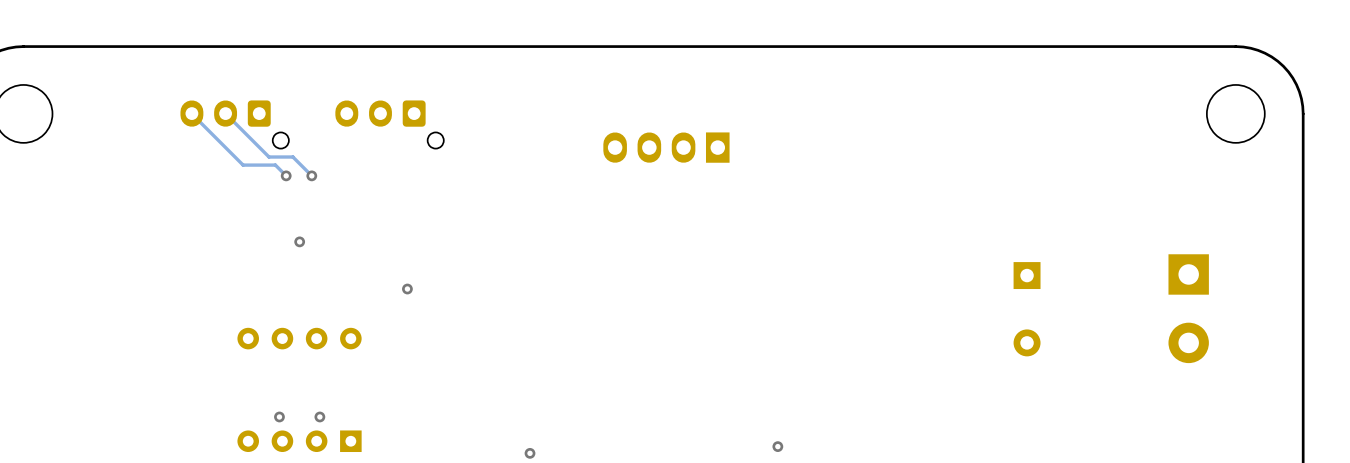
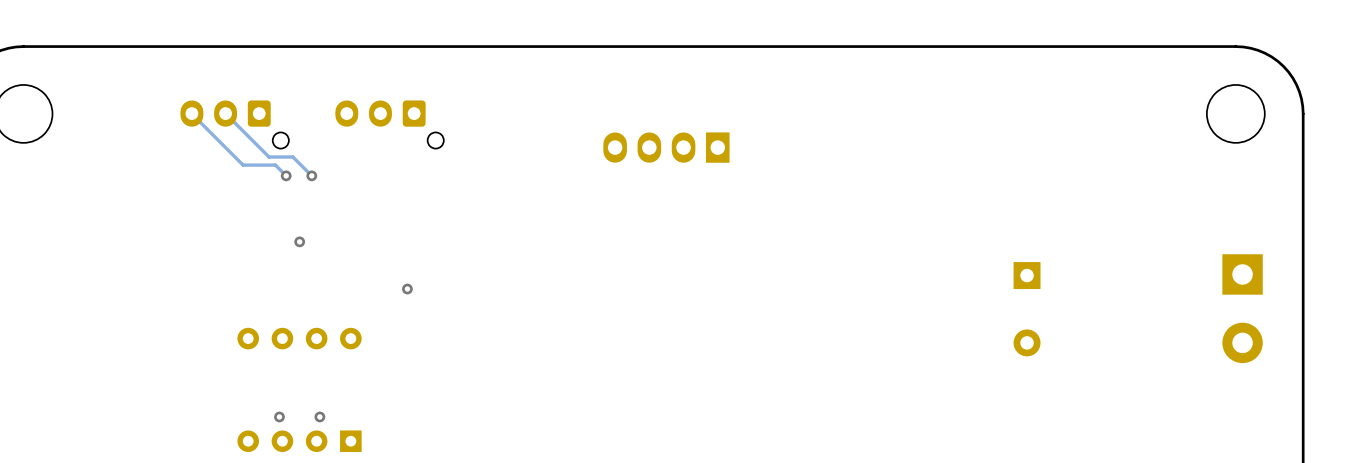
part position: (1188, 308) -> (1242, 308)
via: (777, 446) -> none
via: (530, 453) -> none

